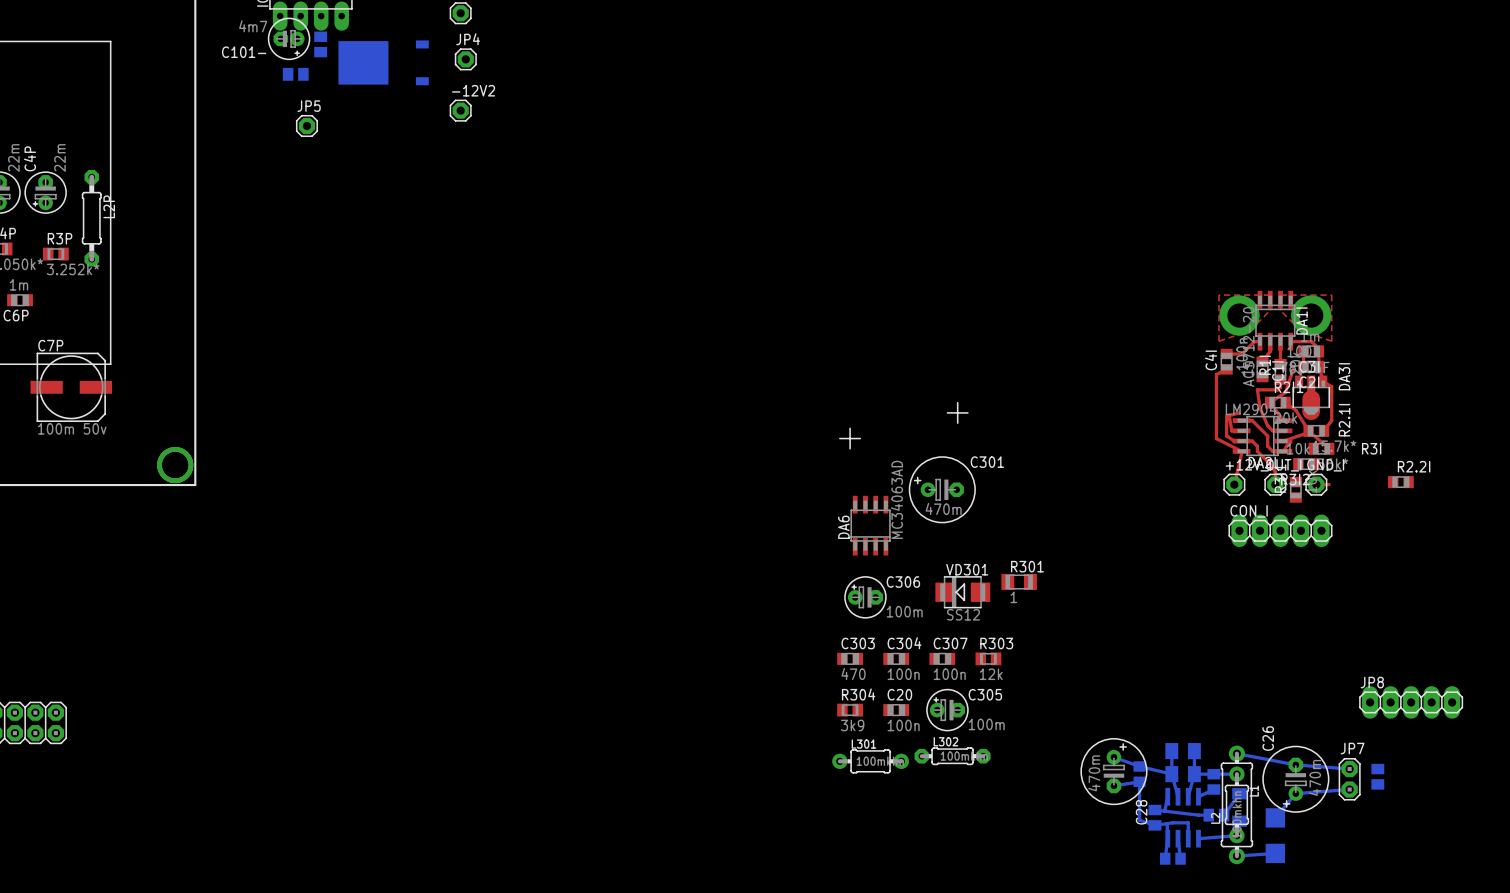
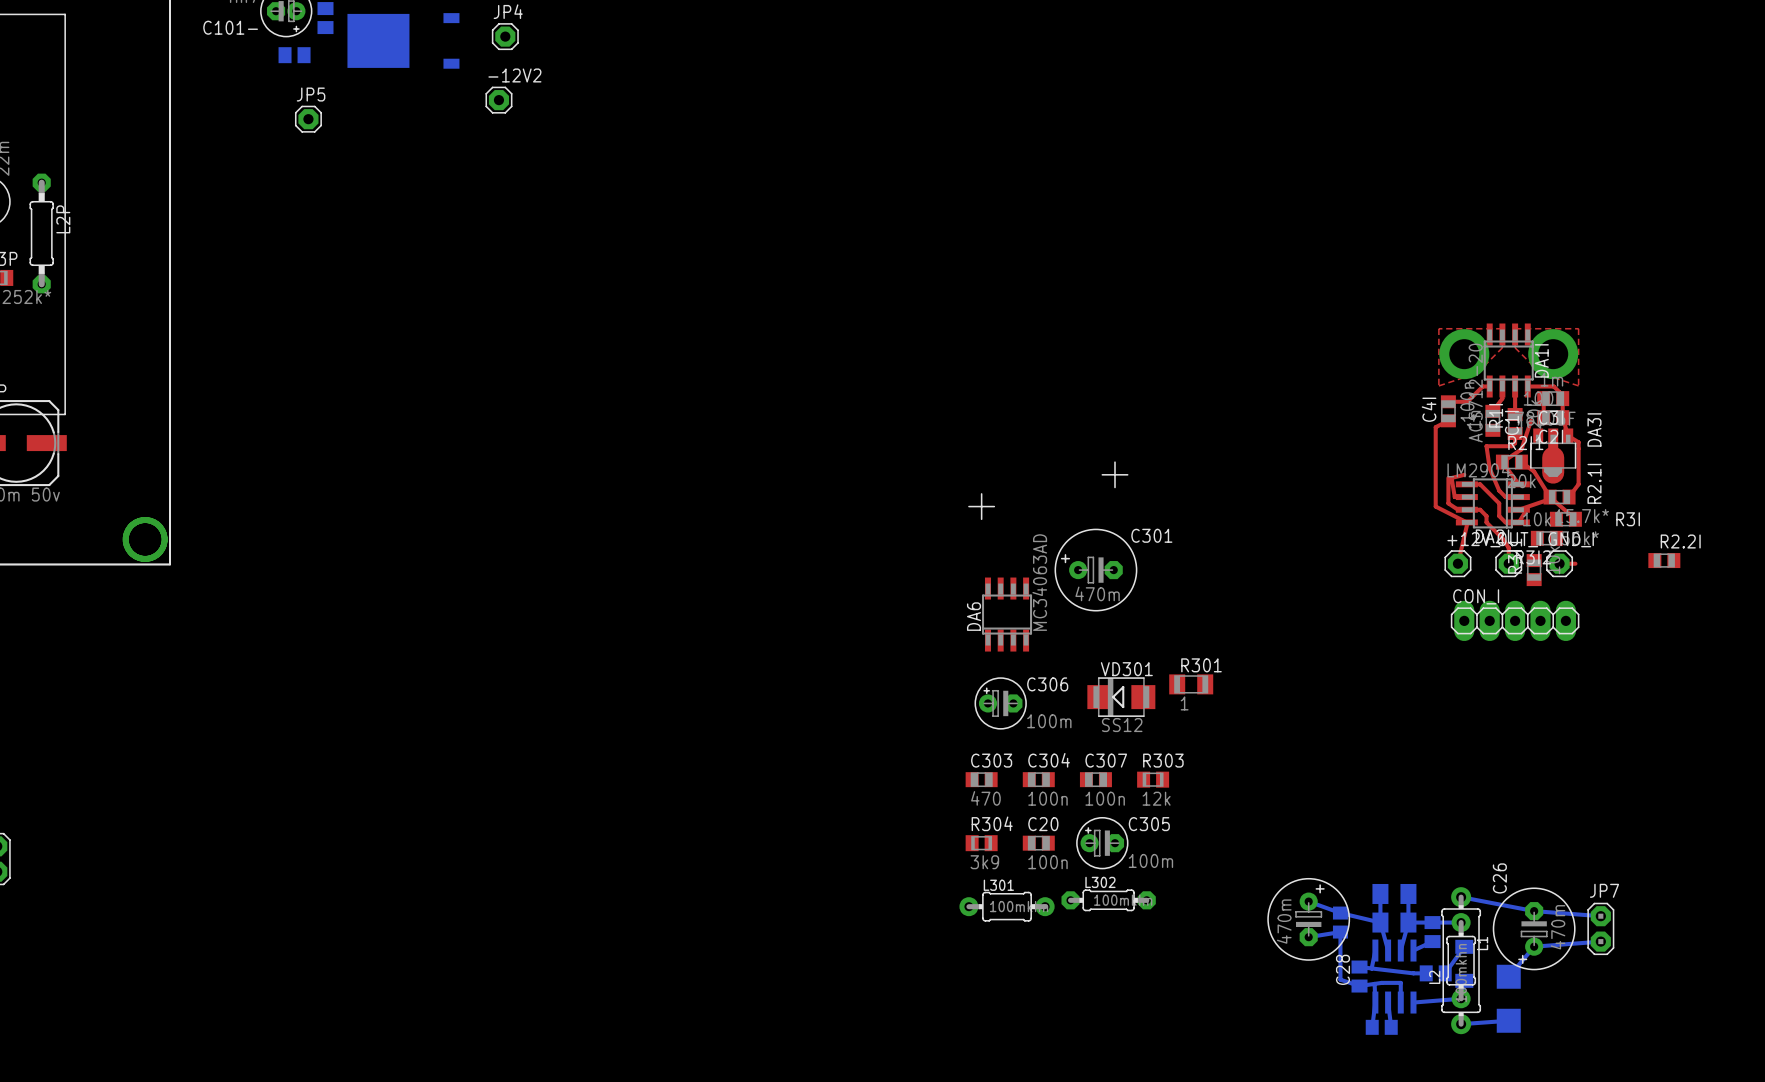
JP8: (1411, 702) -> none
part: (1377, 776) -> none

